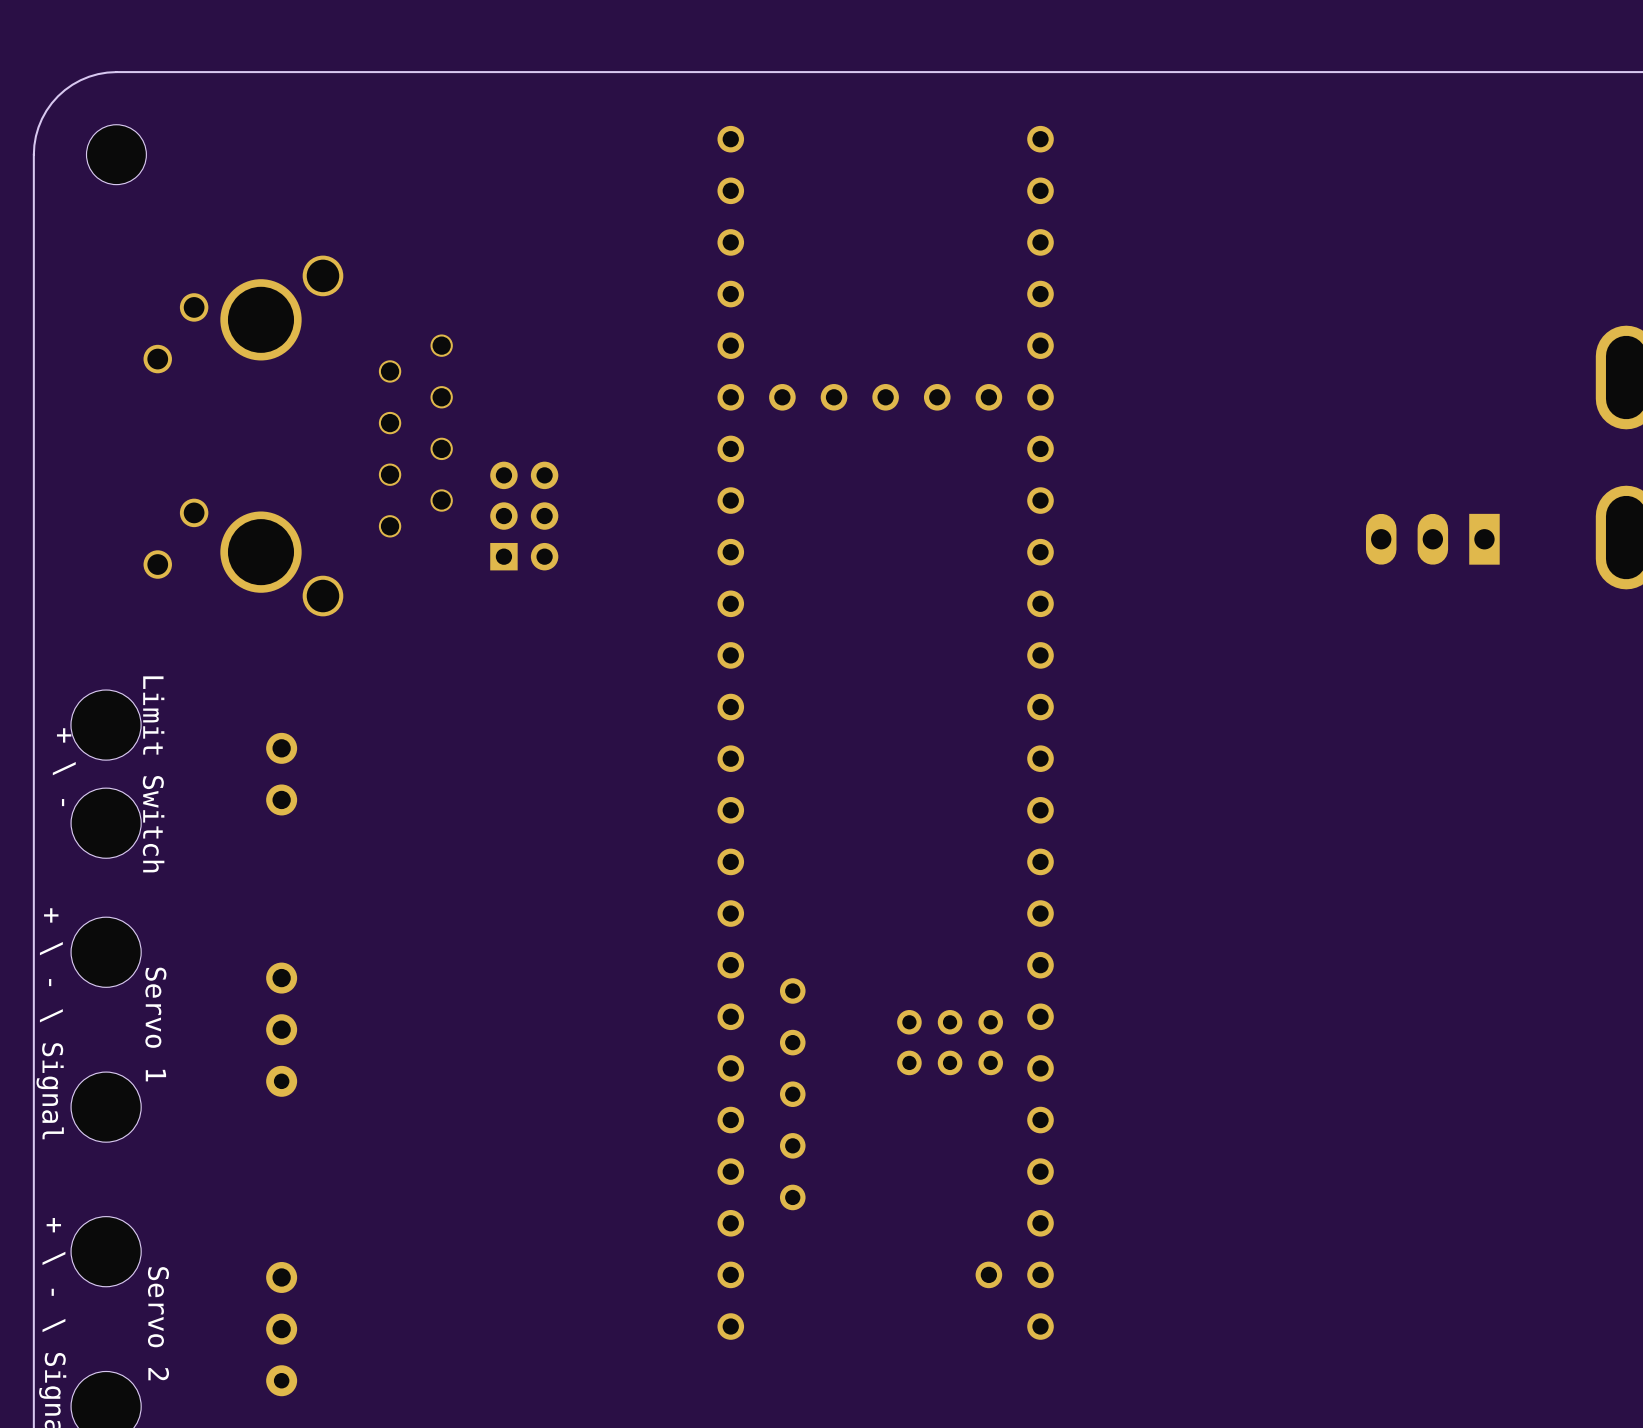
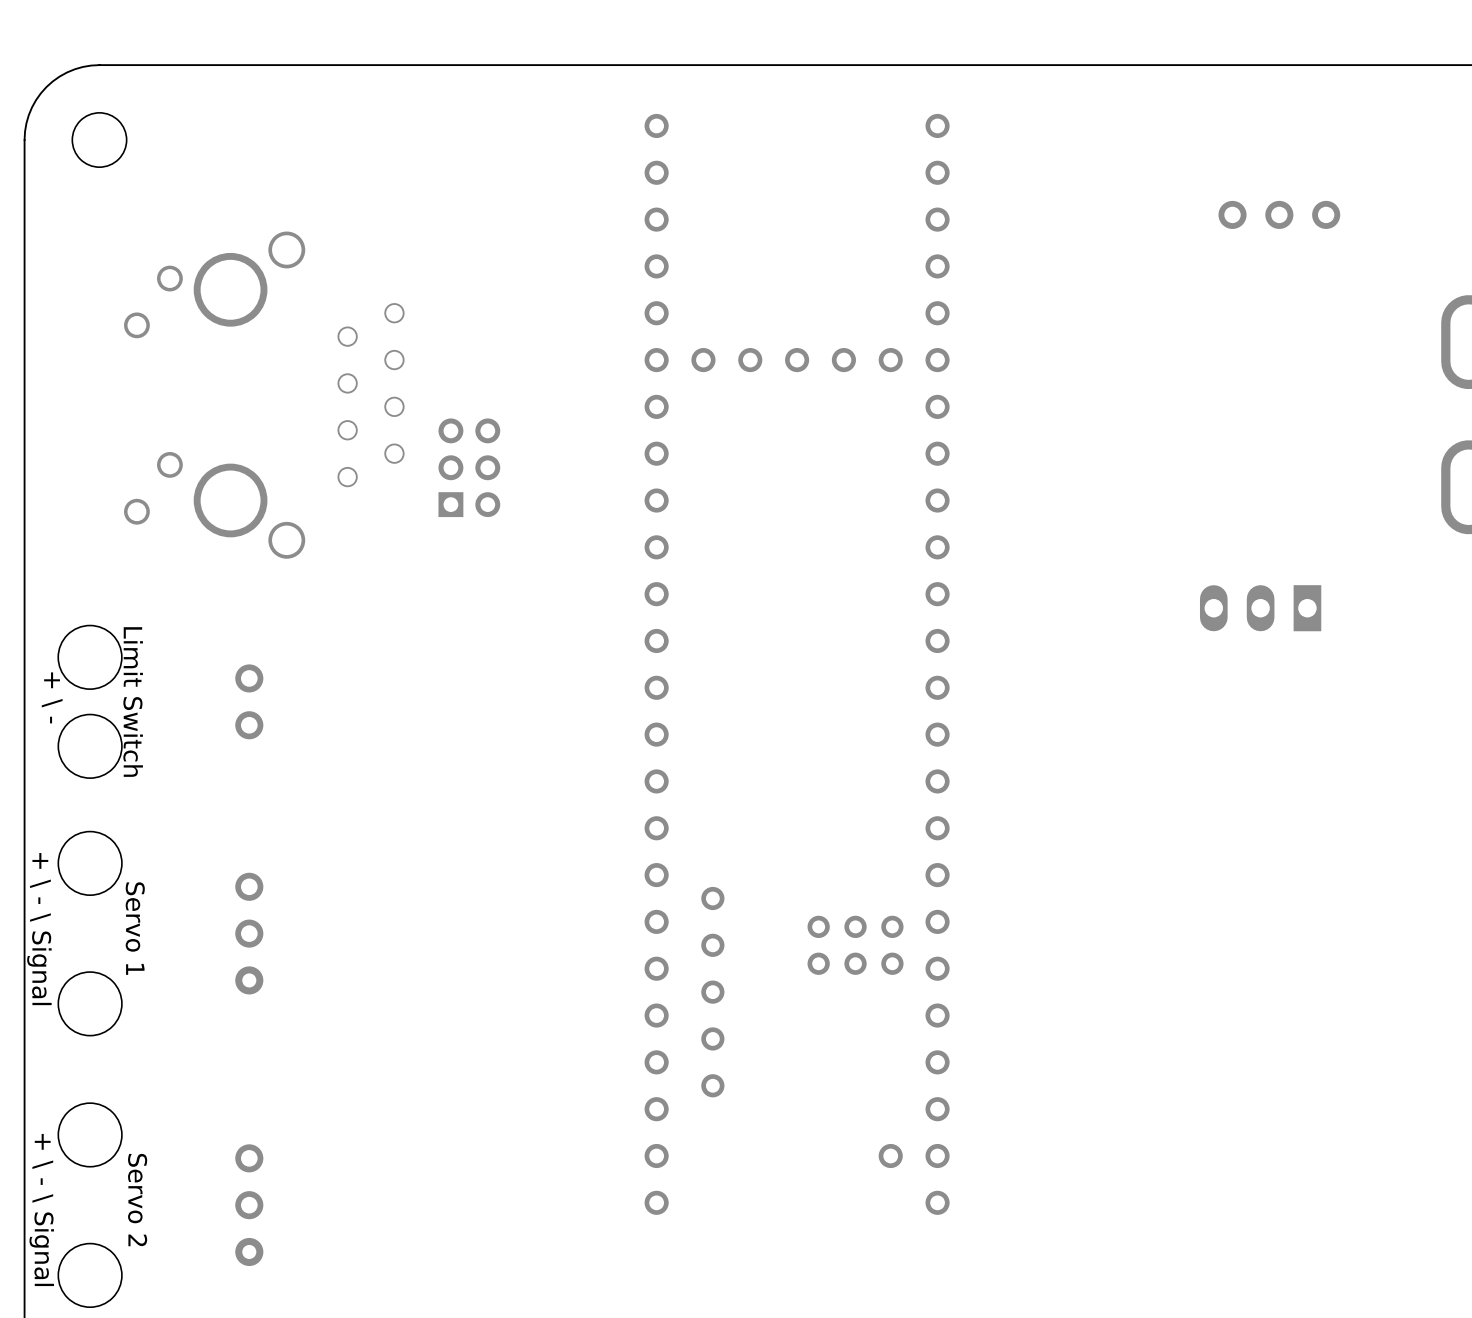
part: none -> (1279, 214)
part position: (1432, 539) -> (1260, 608)

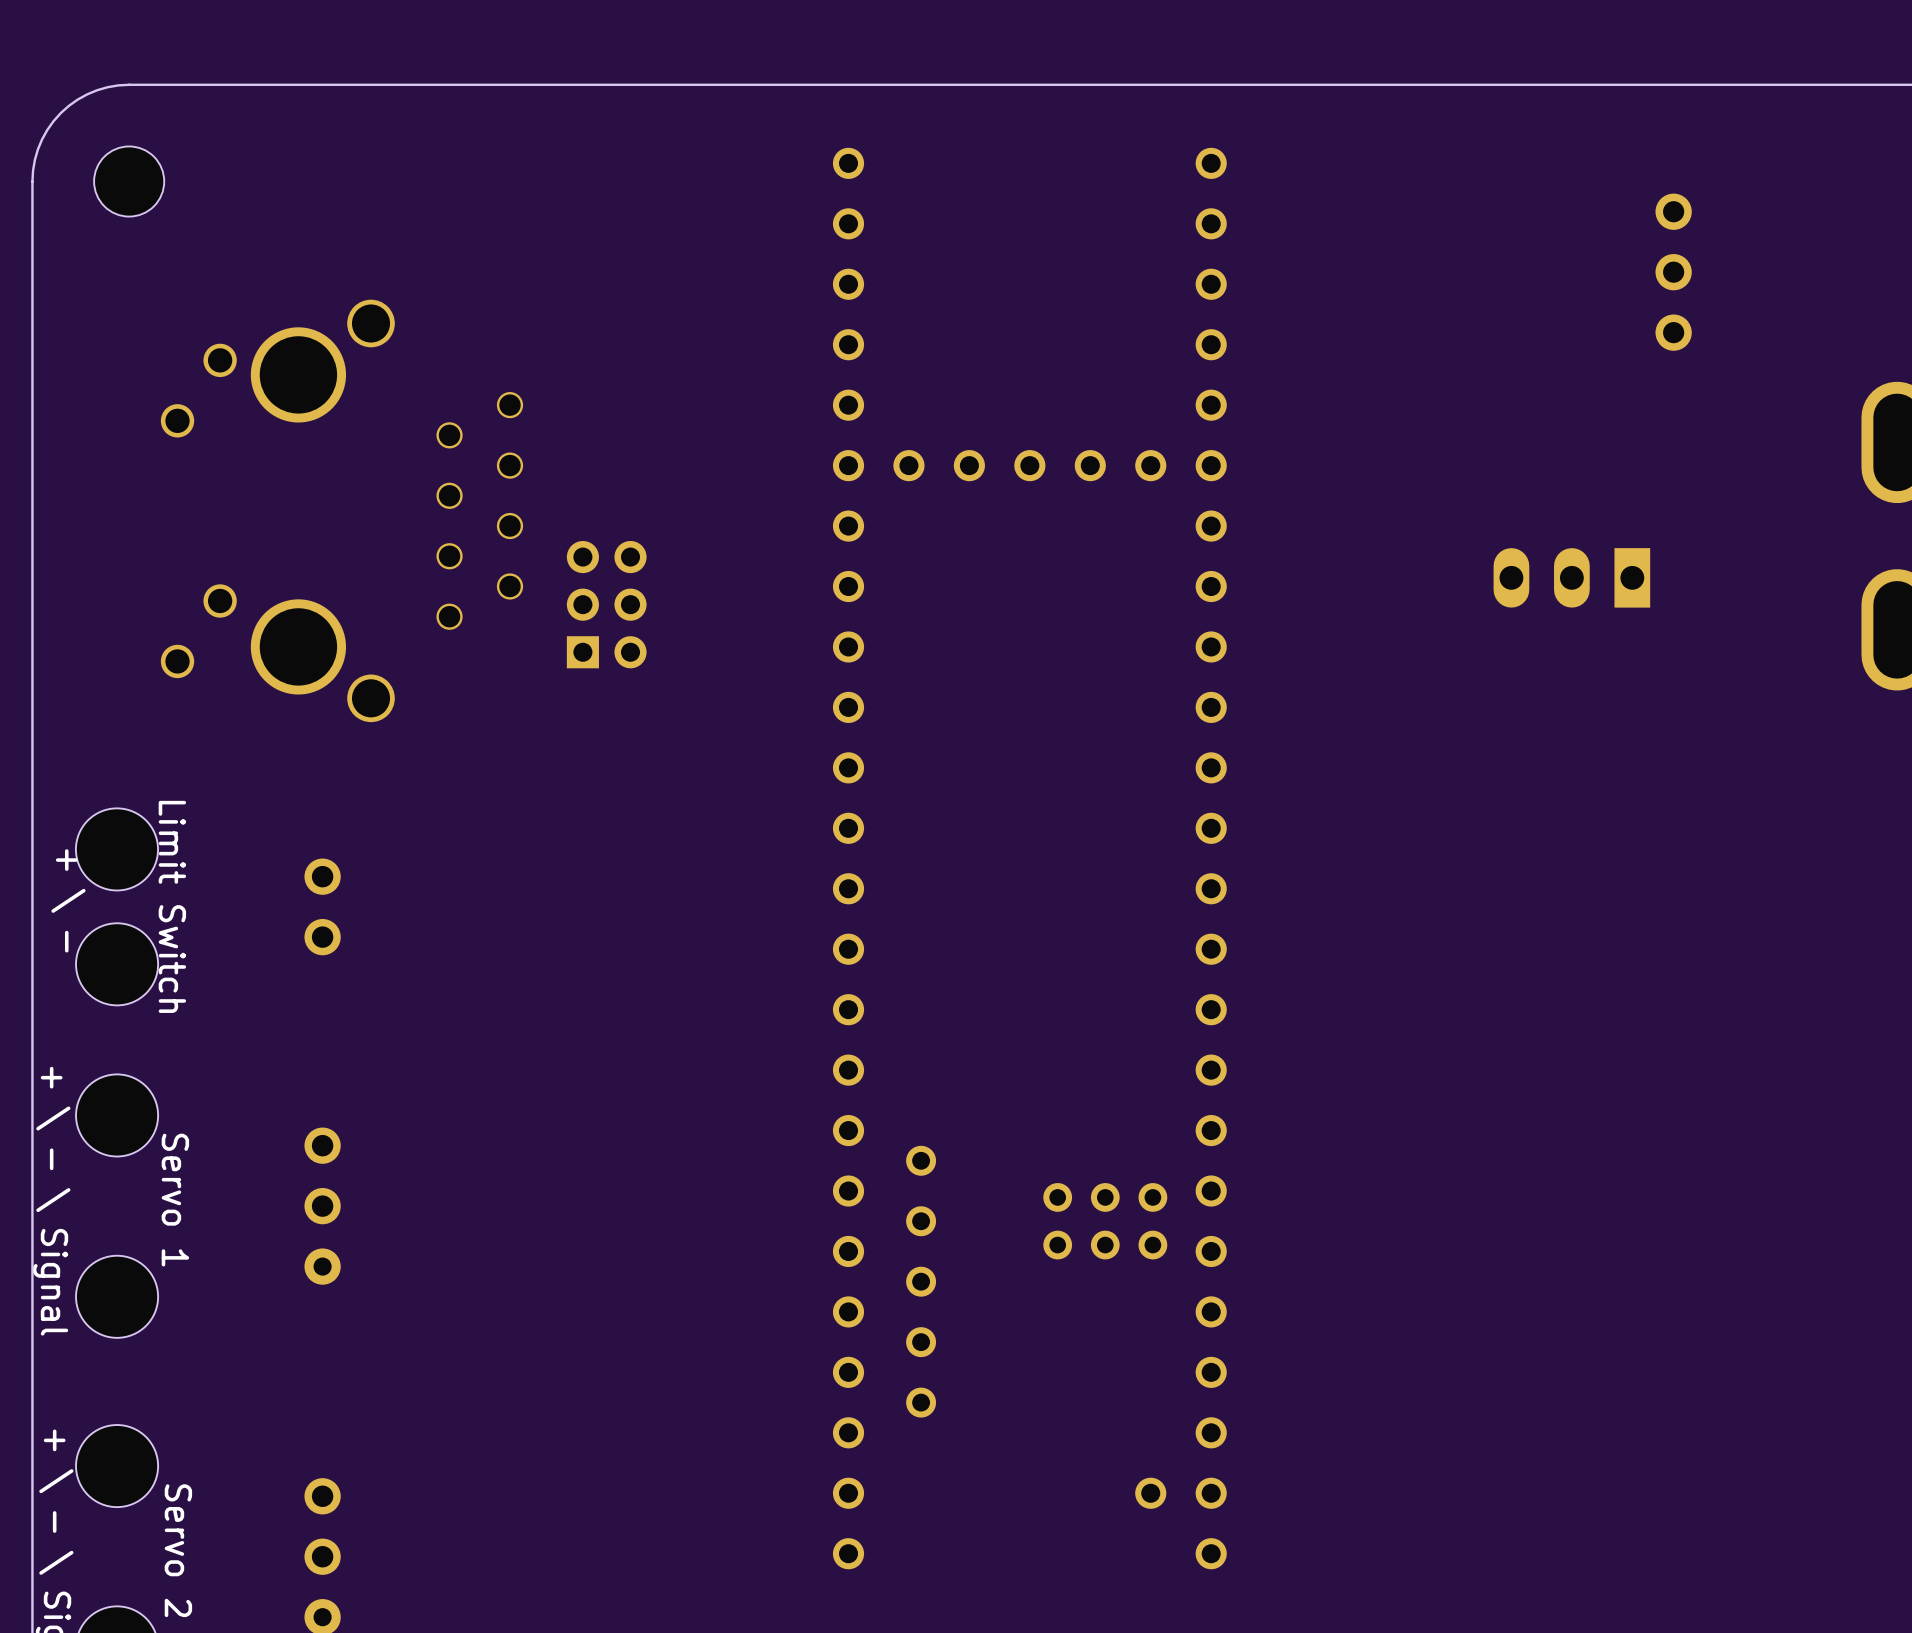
part rotation: 0° (1279, 214) -> 90° clockwise (1673, 272)
part position: (1260, 608) -> (1571, 577)

